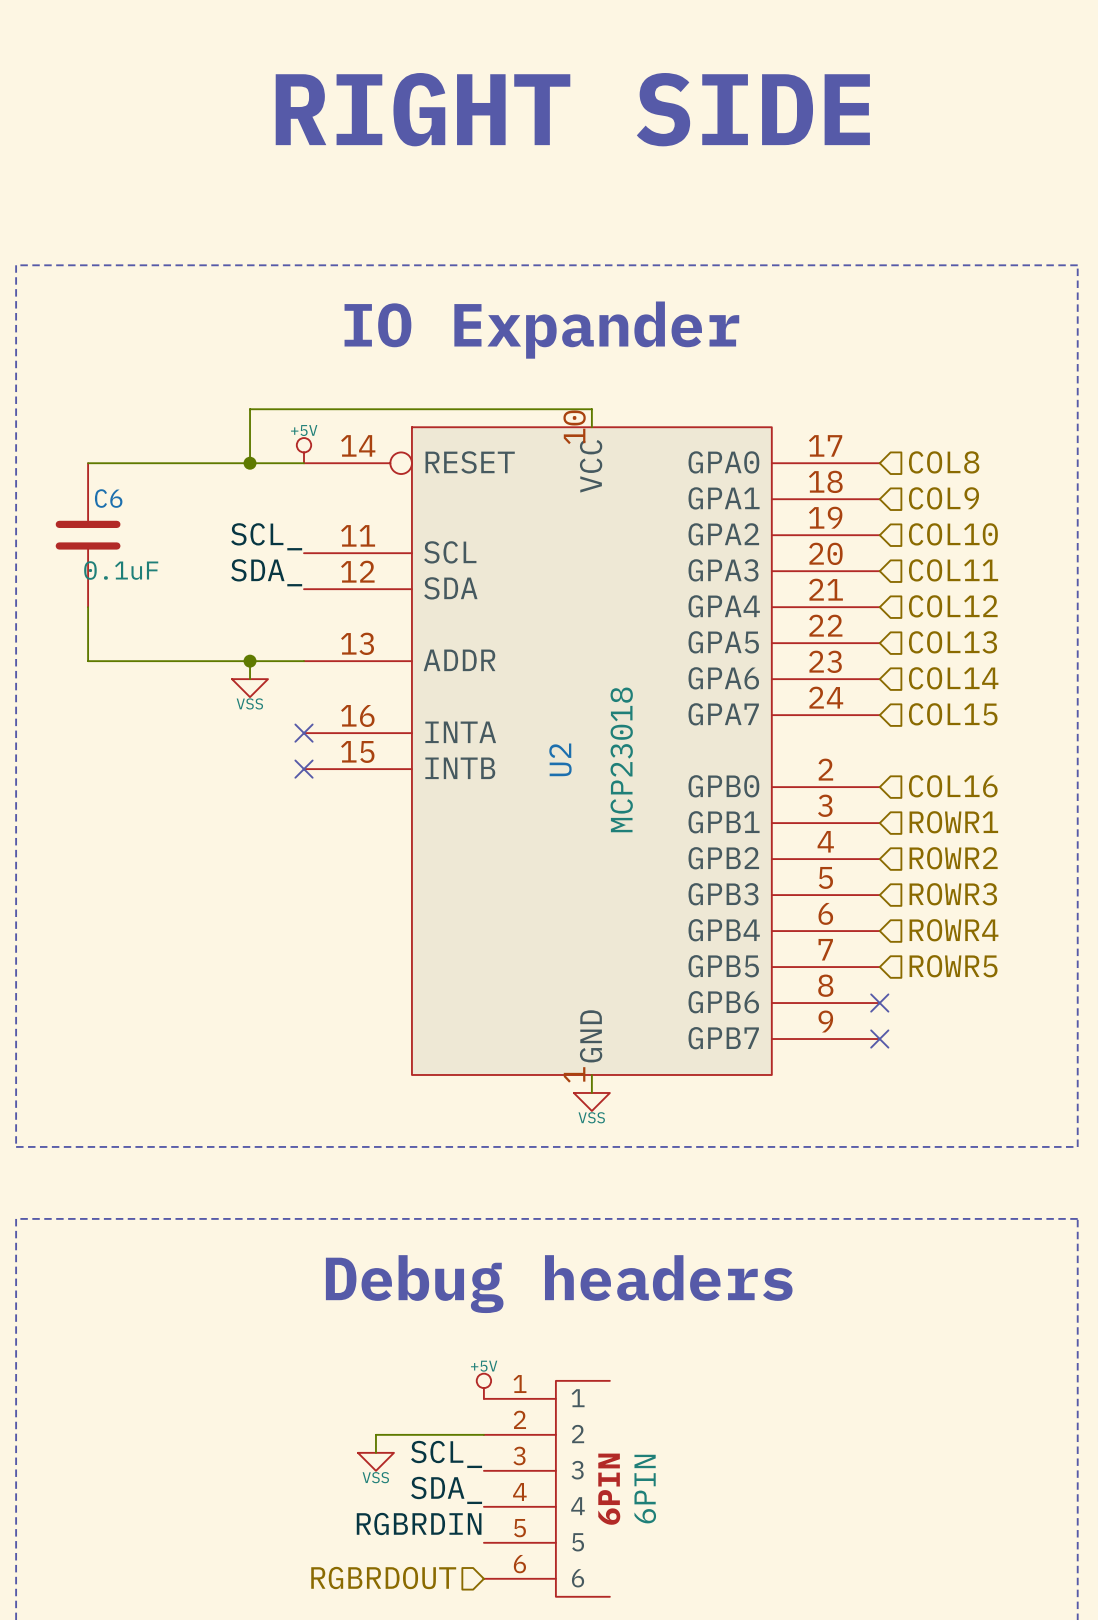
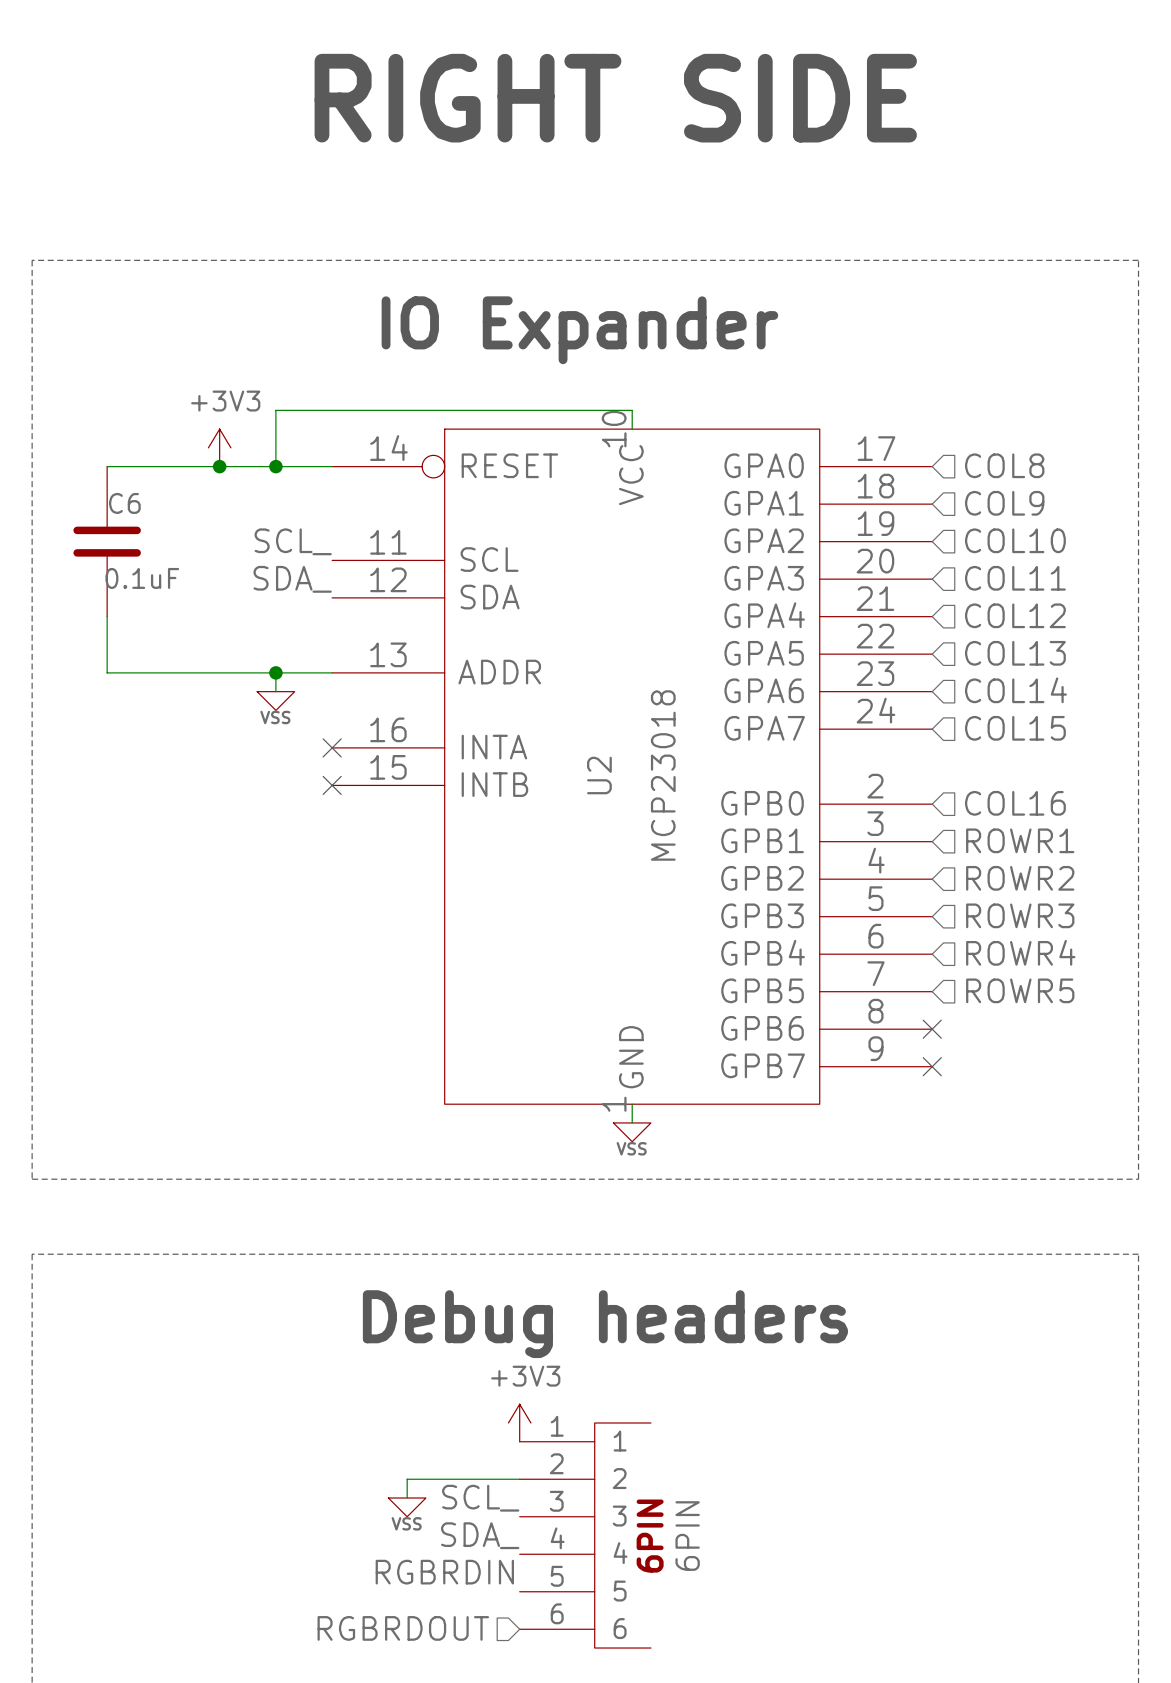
power symbol: none -> +3V3 (219, 447)
power symbol: +5V (304, 450) -> none
junction: none -> (219, 466)
power symbol: +5V (483, 1386) -> +3V3 (519, 1422)

